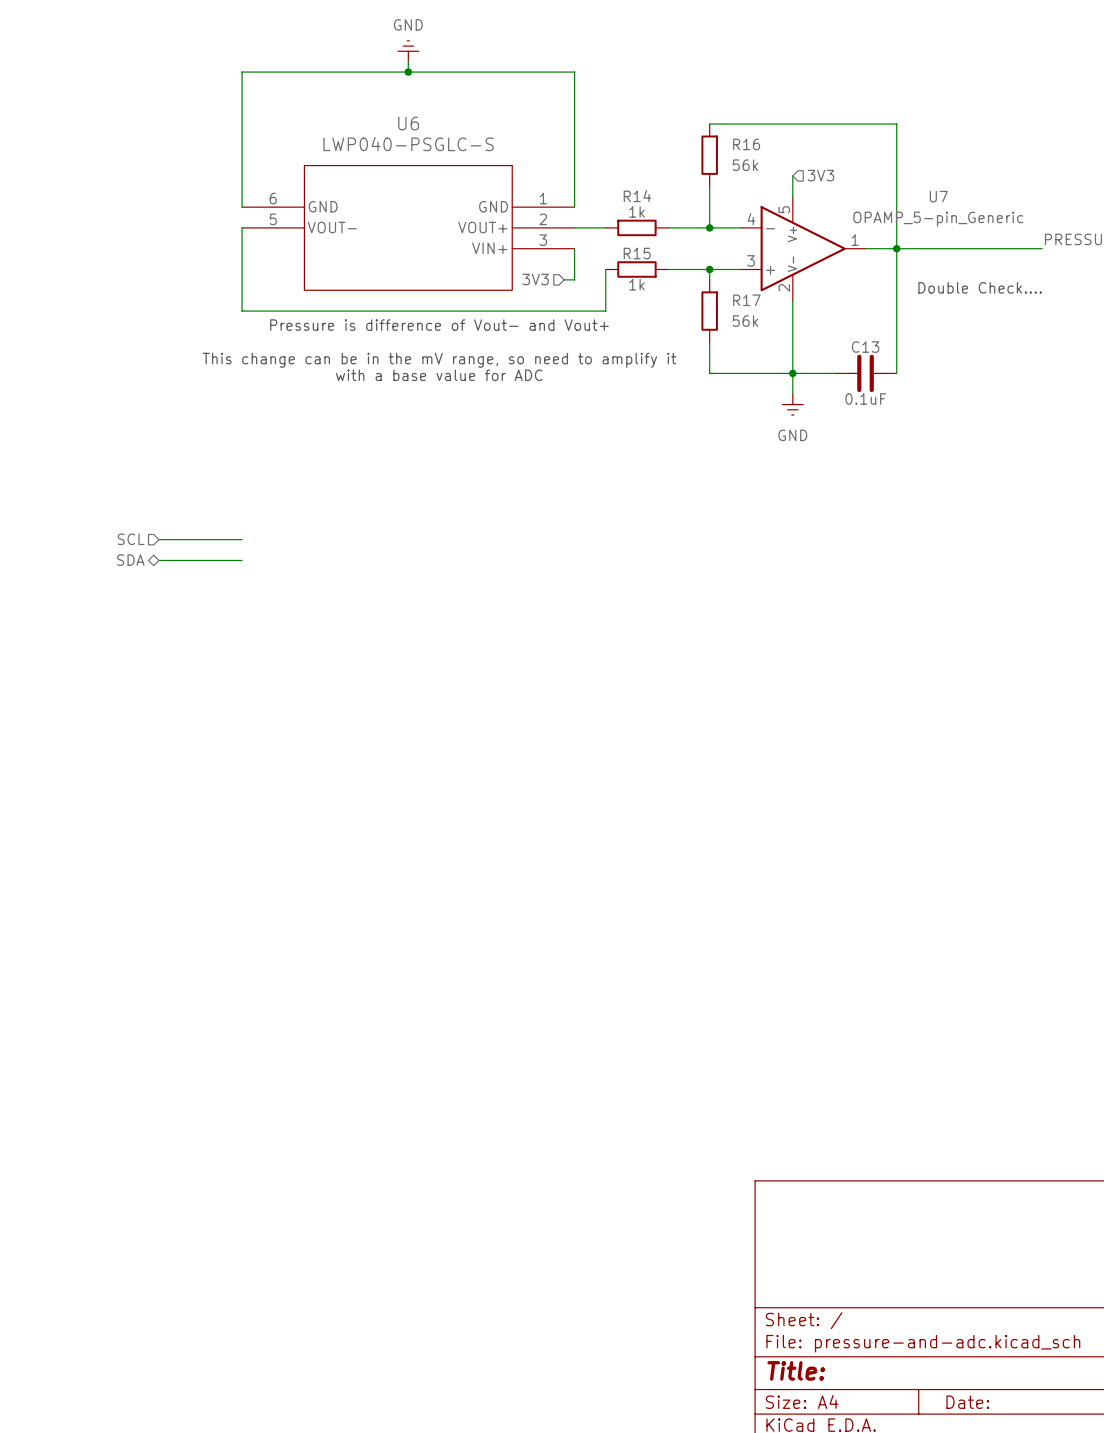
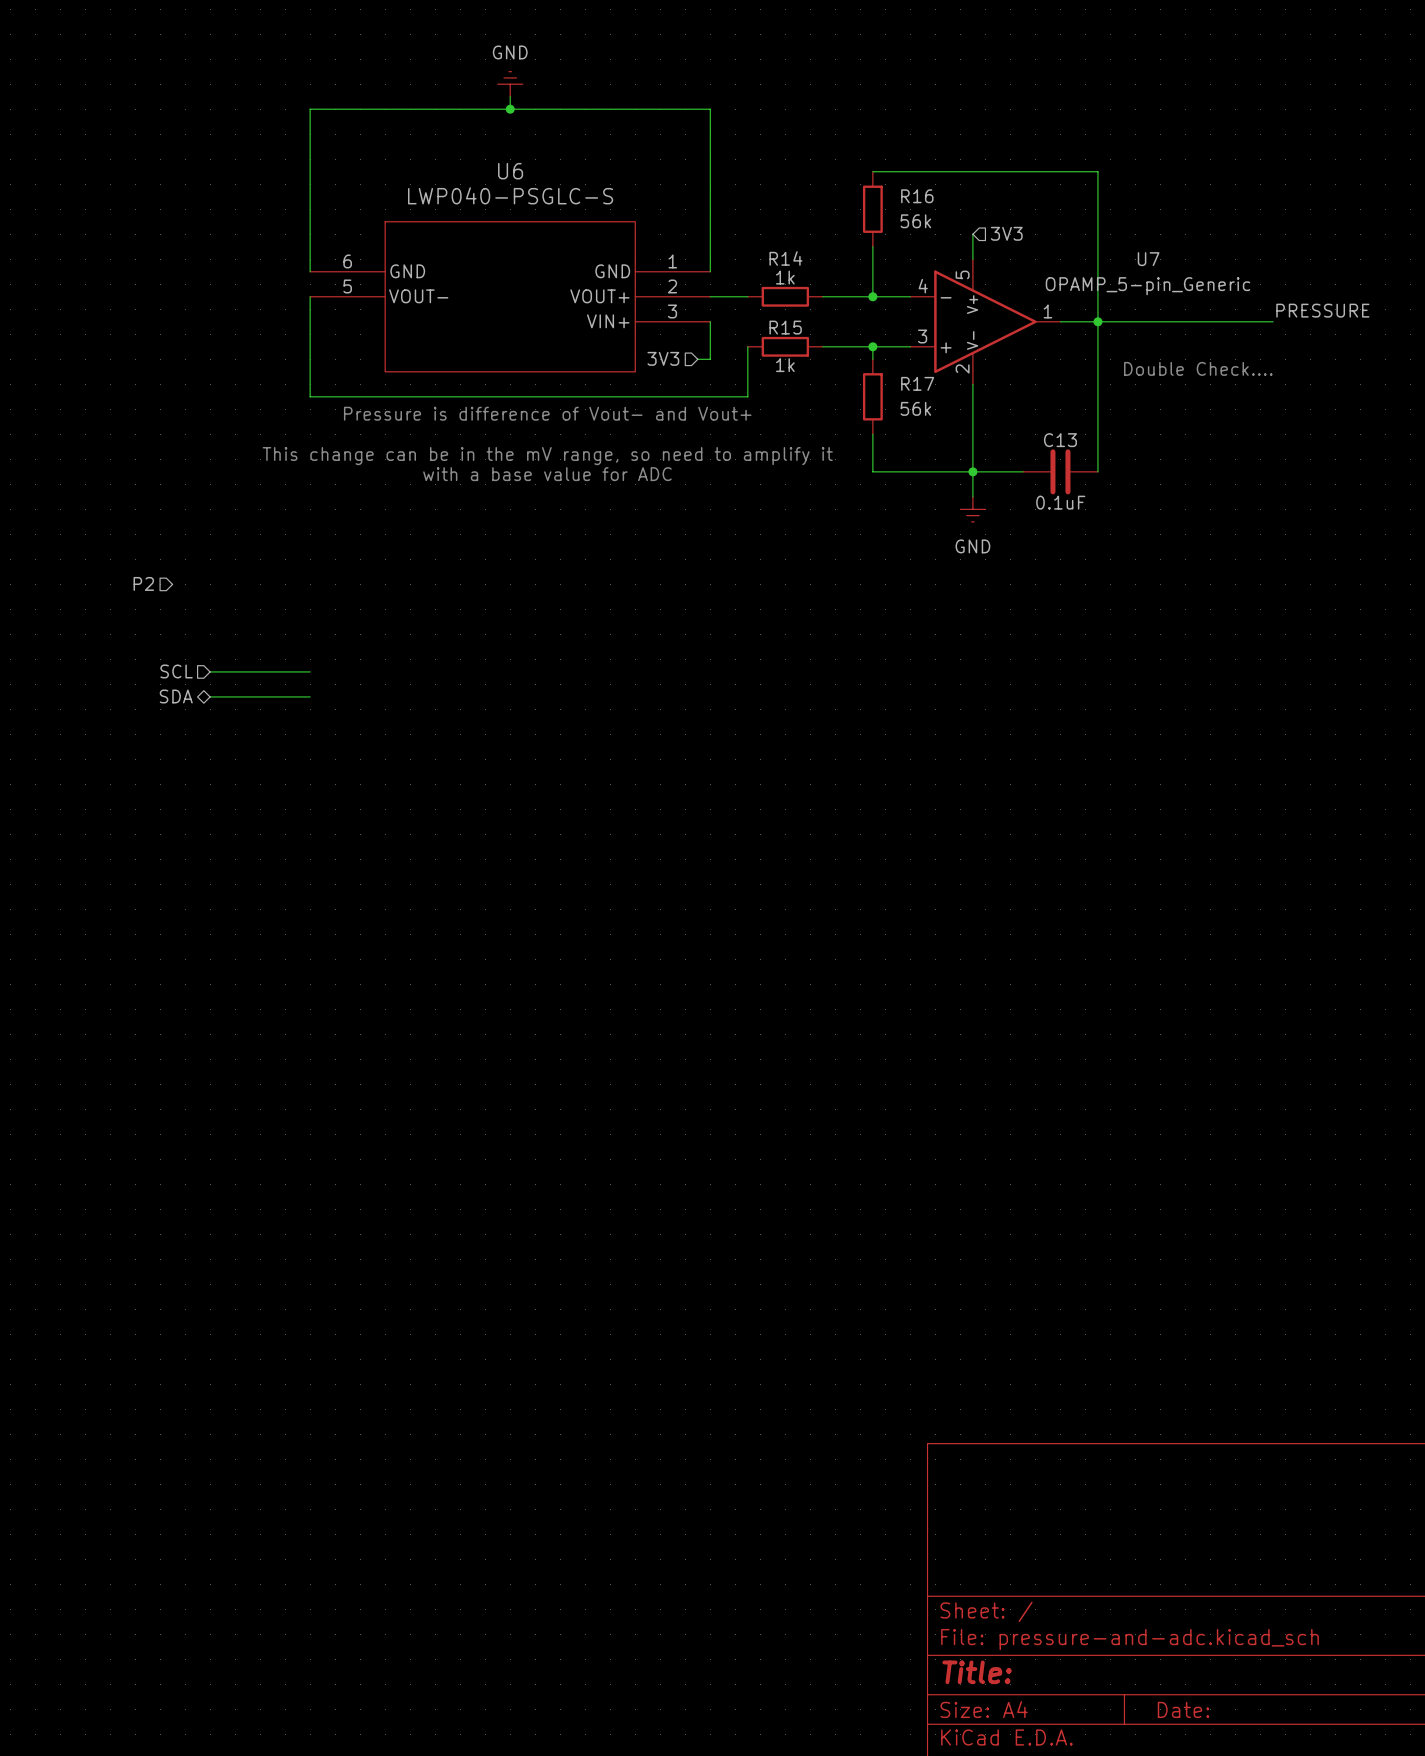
hierarchical label: none -> P2 (143, 583)

